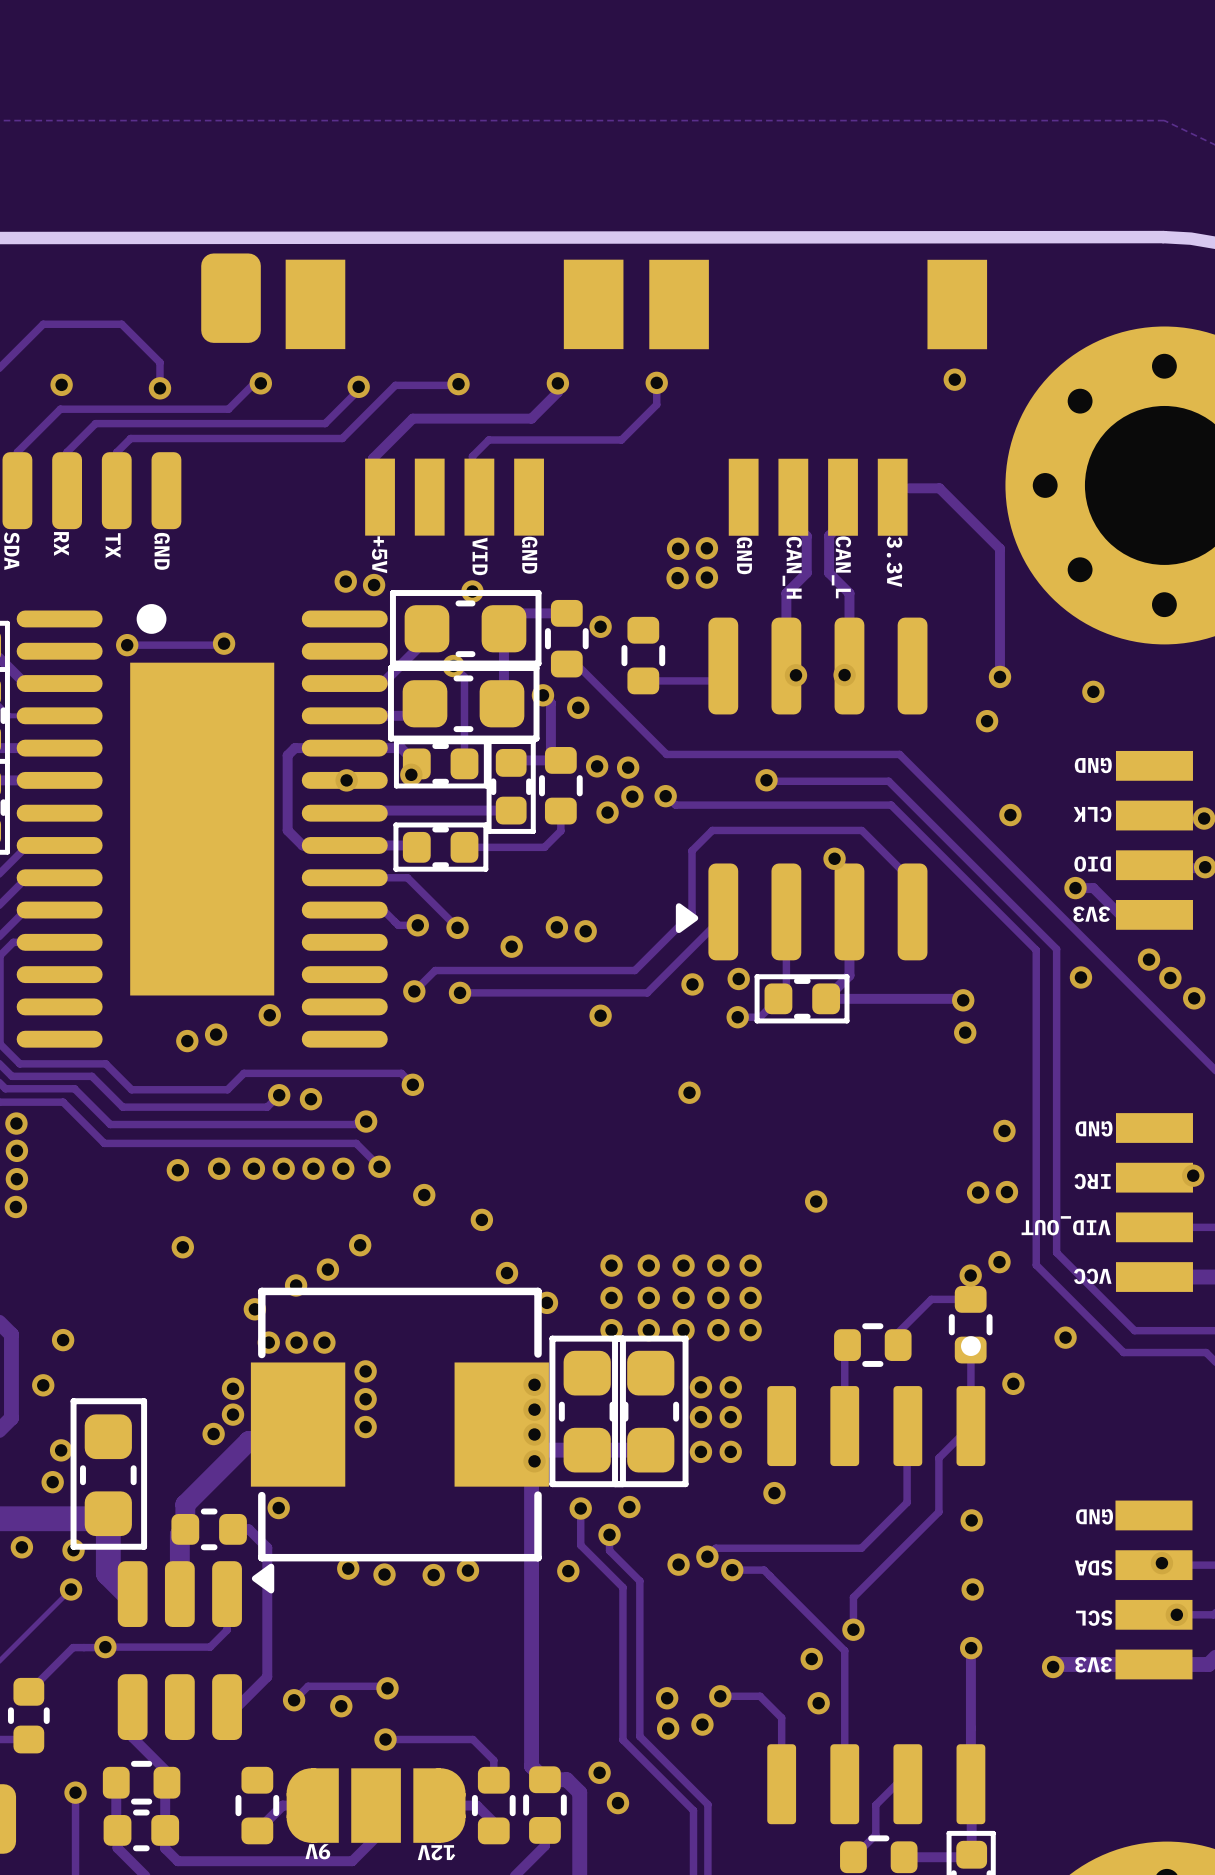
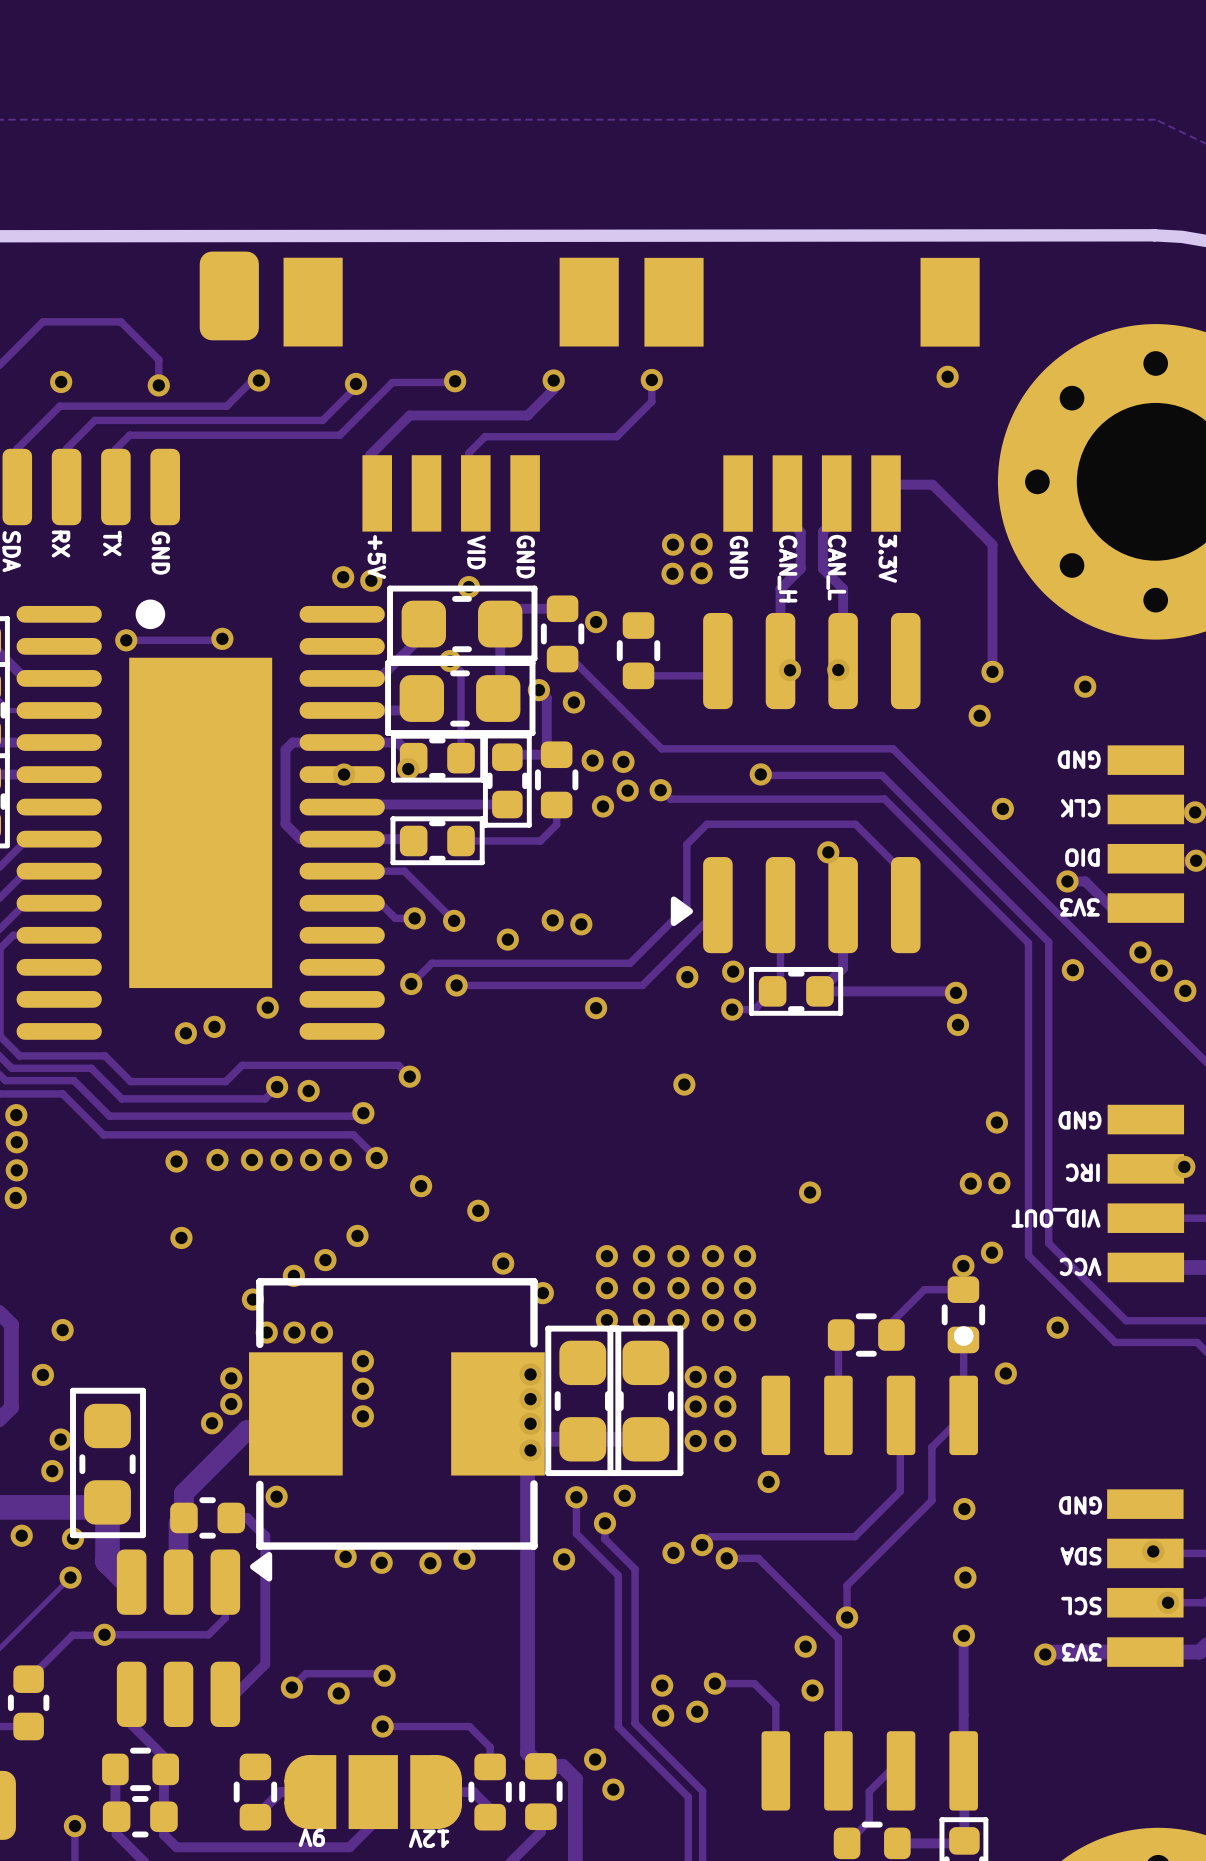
track: (75, 1792) (75, 1839) -> none
via position: (75, 1792) -> (74, 1826)

